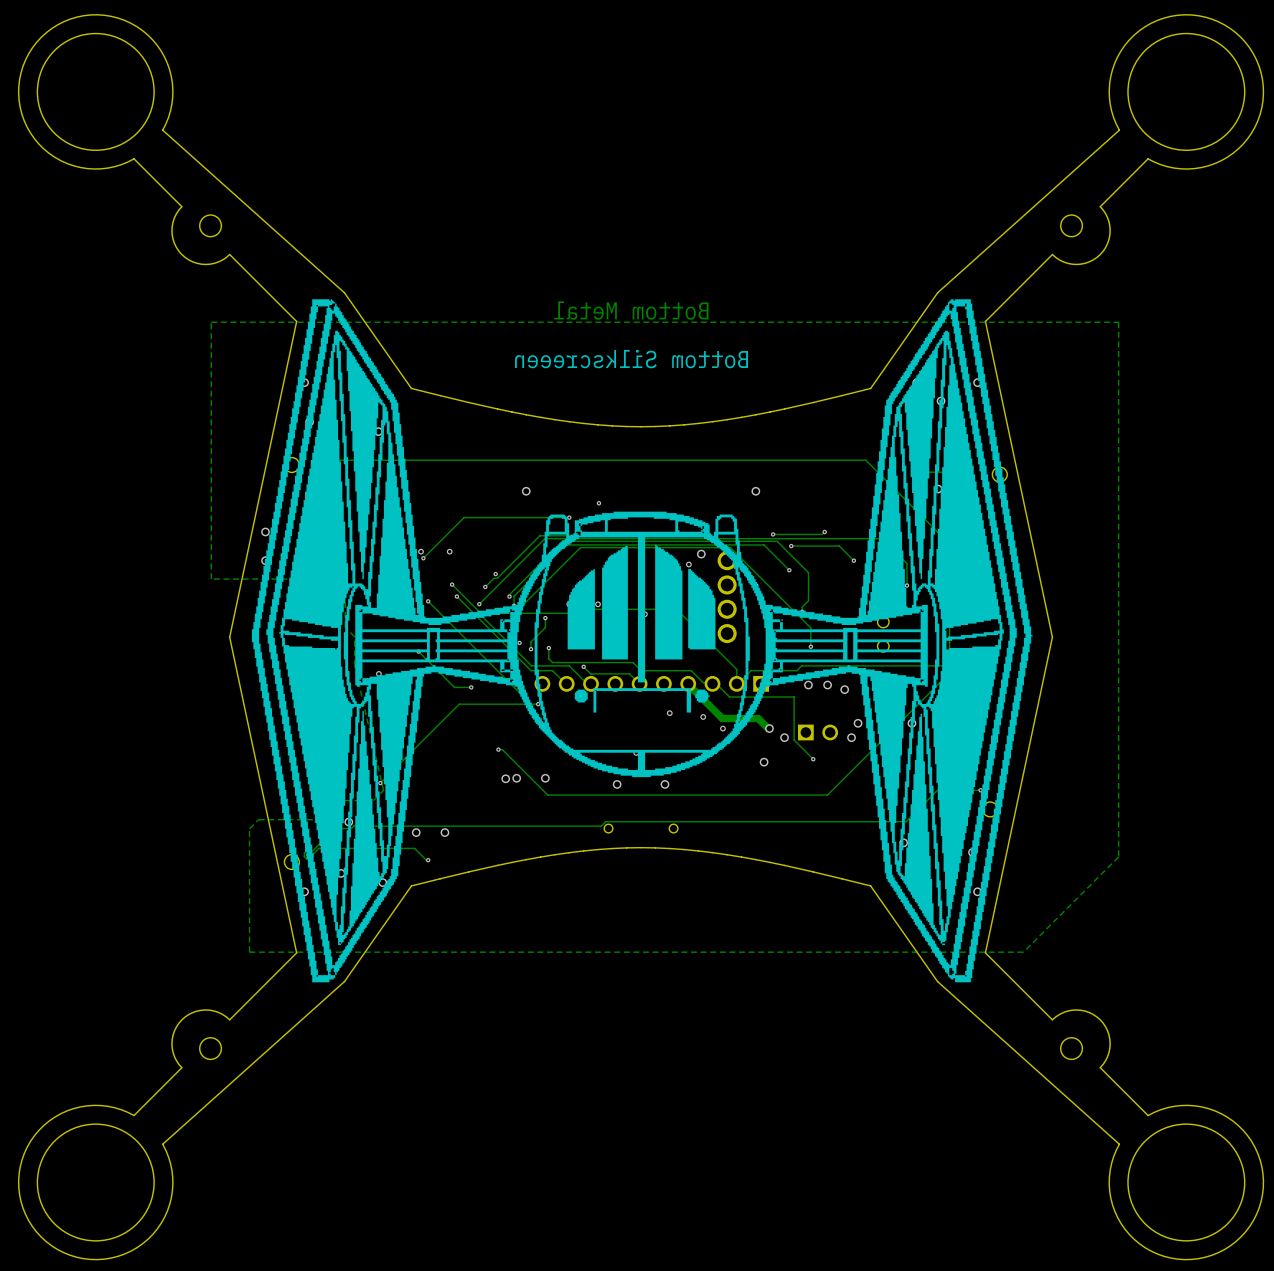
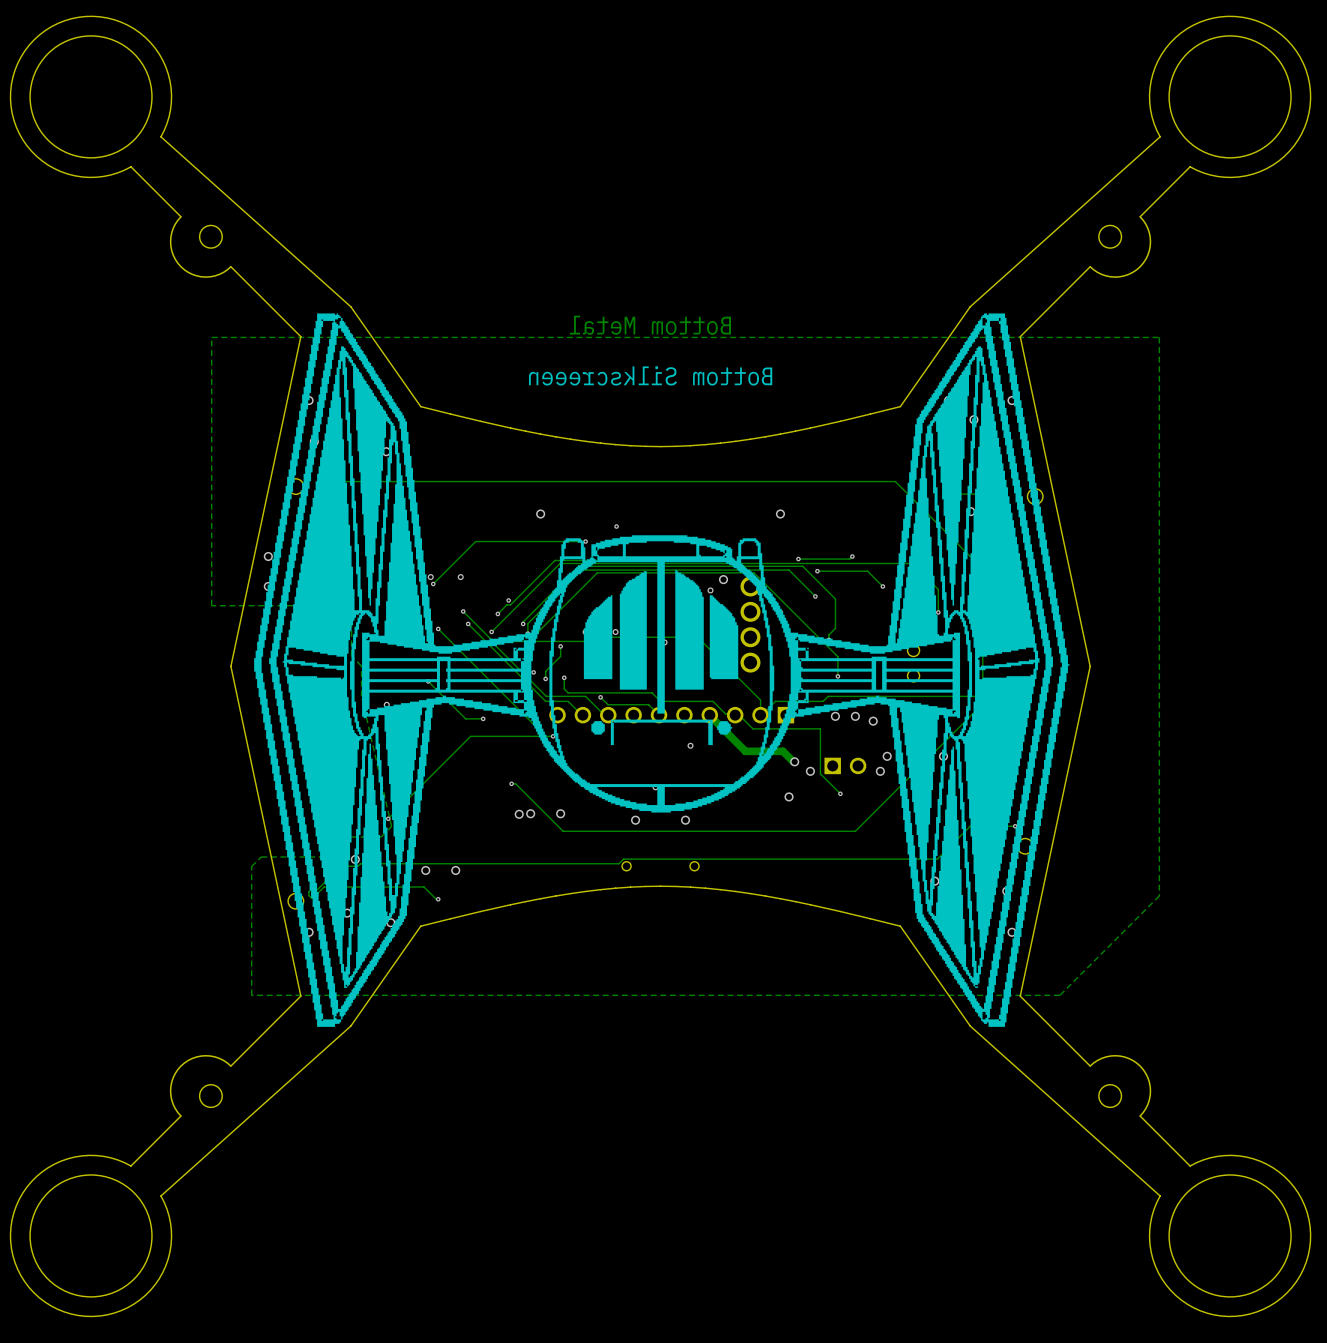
via: (703, 716) -> none
via: (722, 728) -> none

